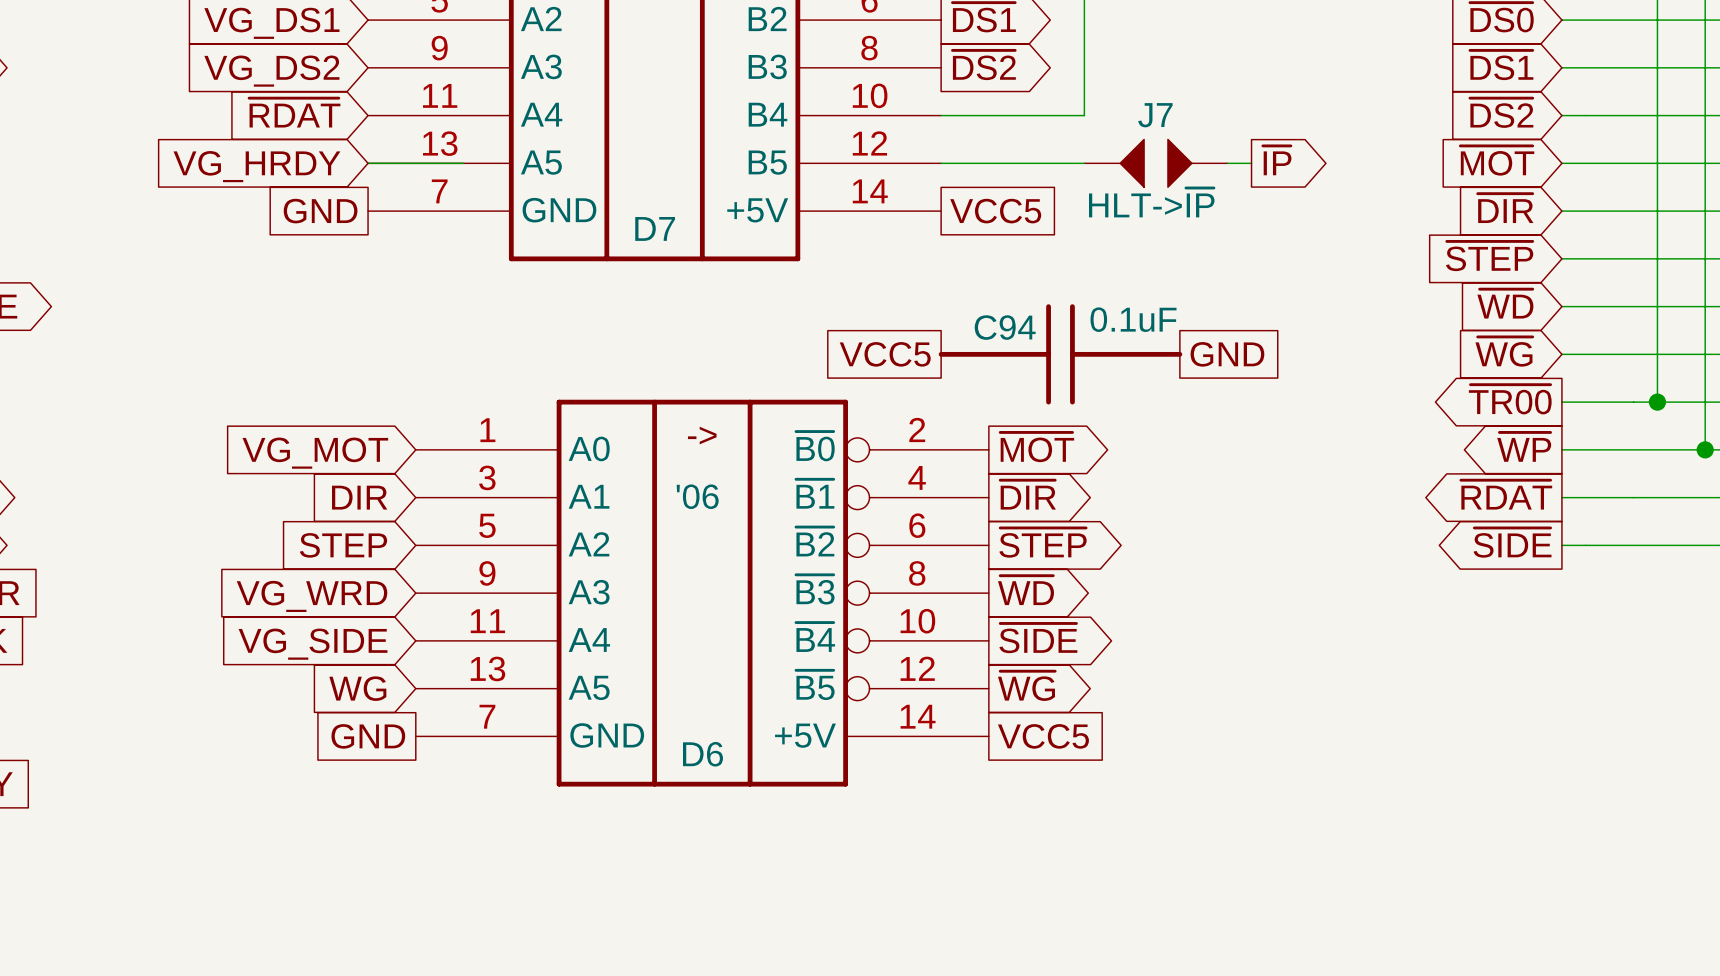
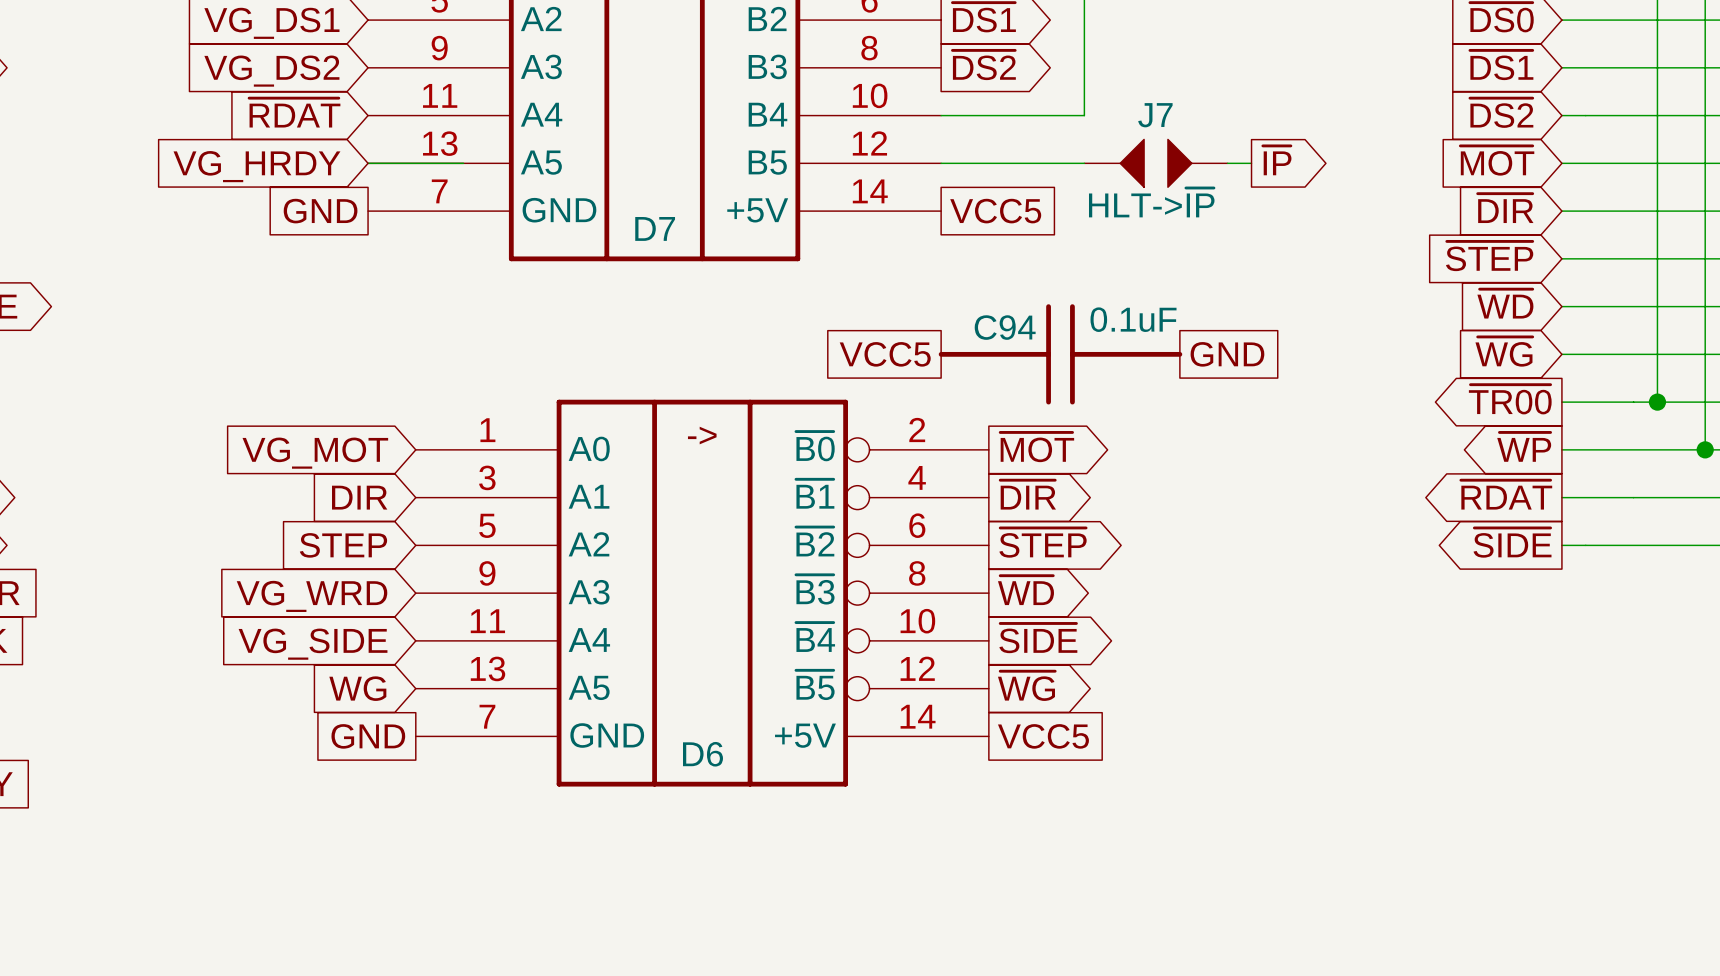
D6 value: '06 (697, 496) -> none

